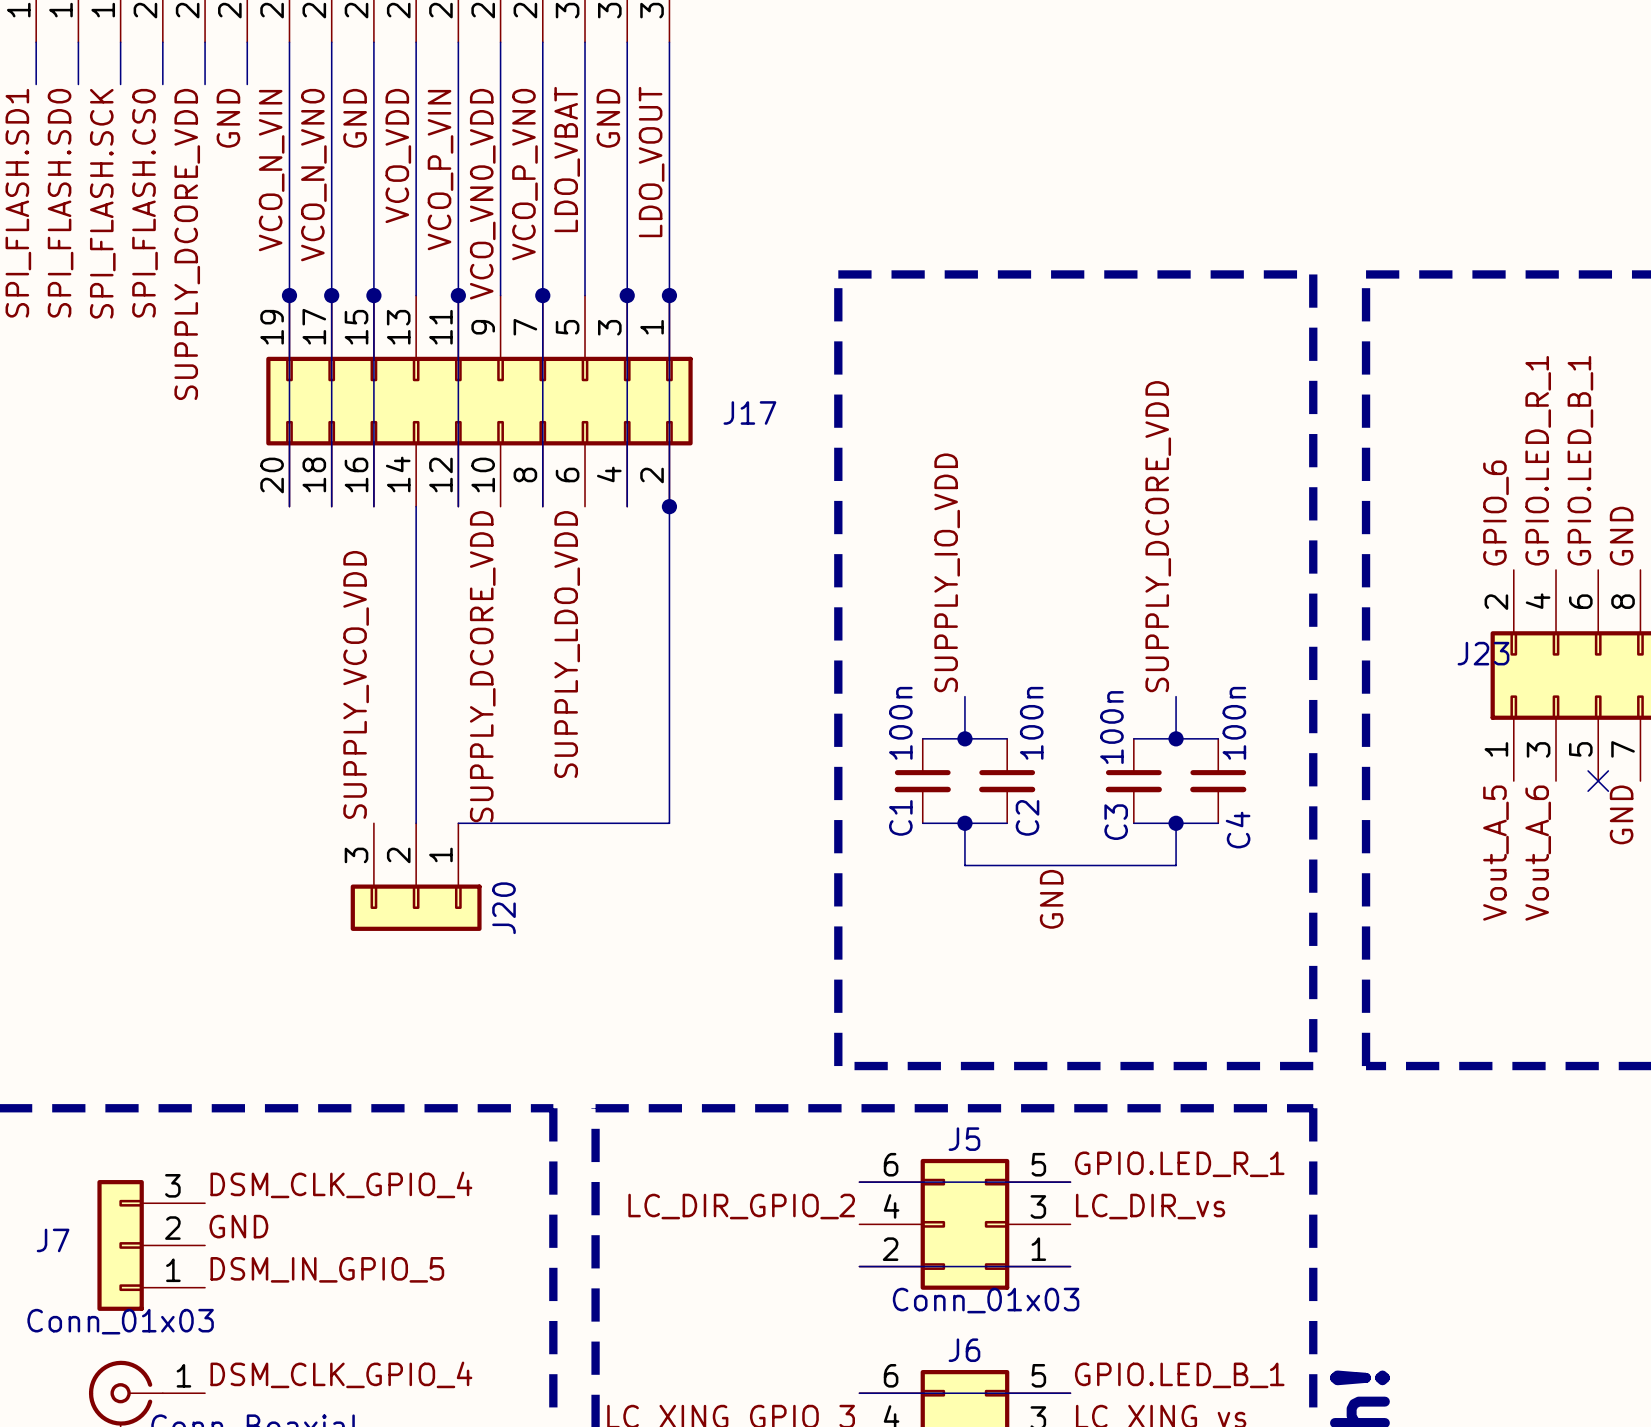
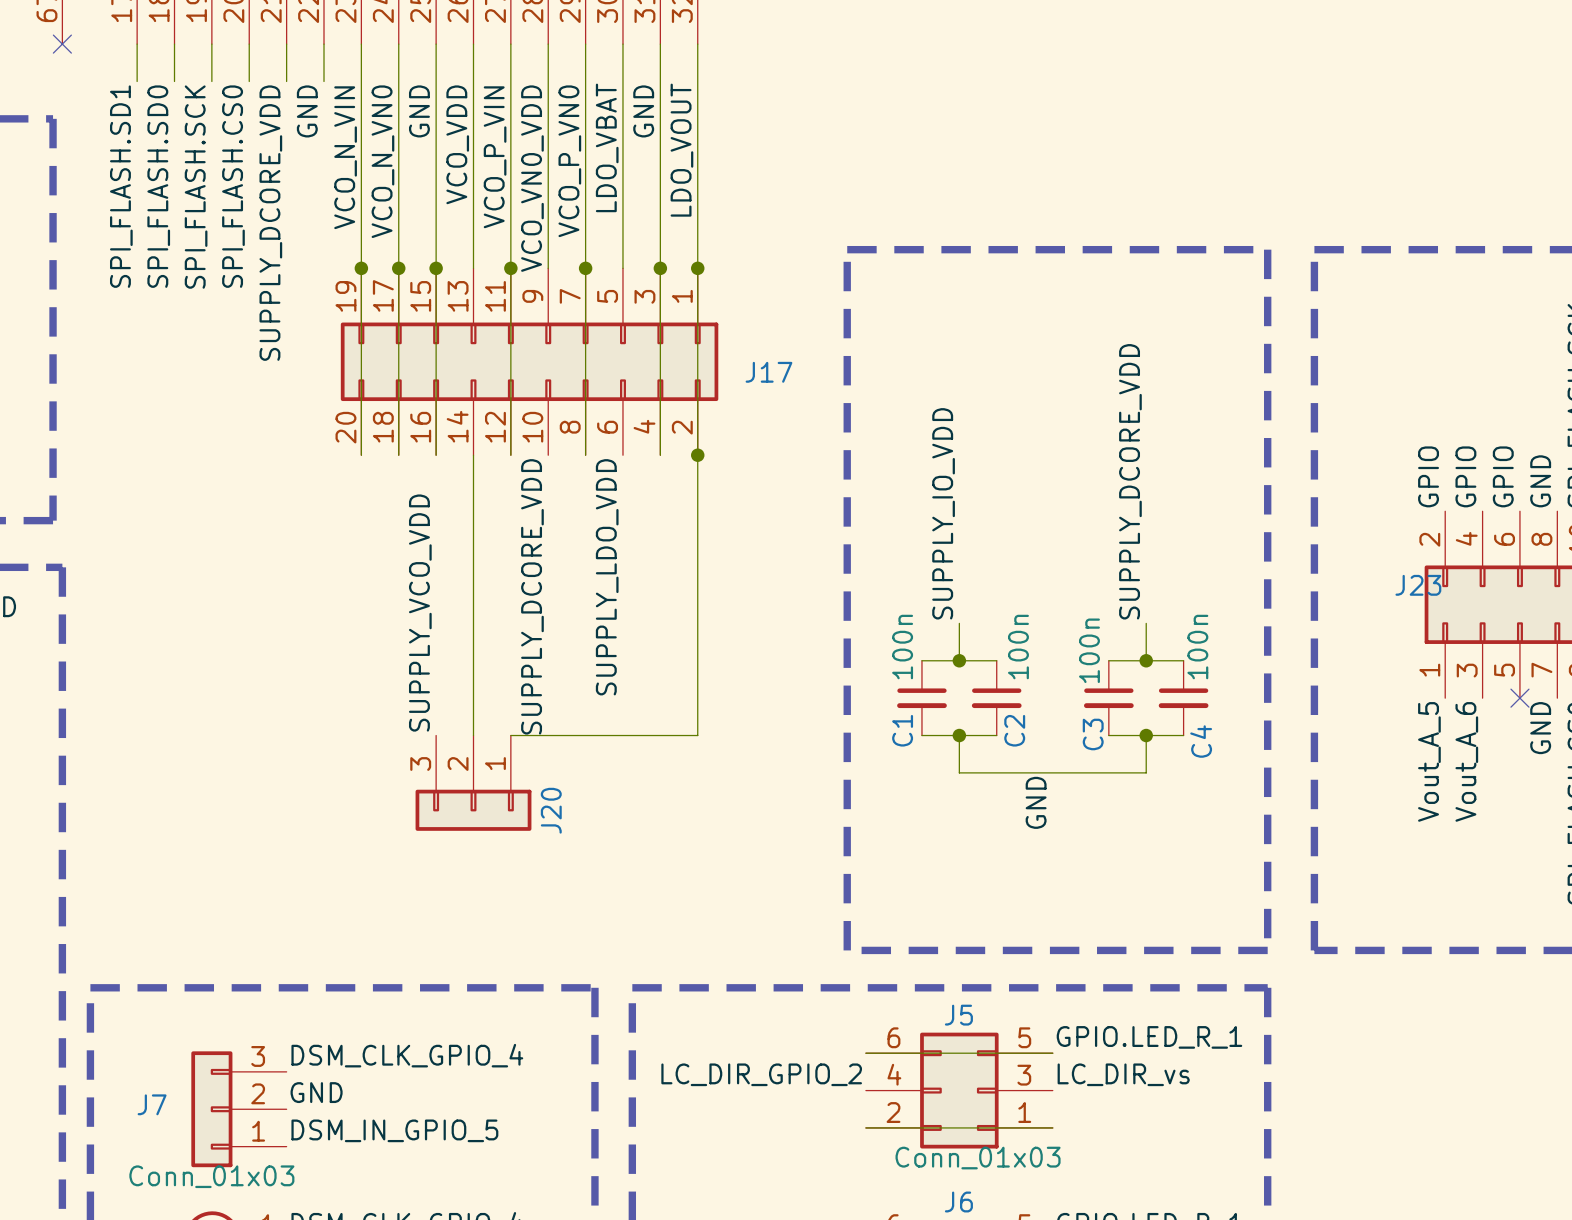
label: GPIO.LED_R_1 (1538, 460) -> GPIO (1465, 476)
label: GPIO.LED_B_1 (1580, 460) -> GPIO (1503, 476)
label: GPIO_6 (1495, 513) -> GPIO (1428, 476)

